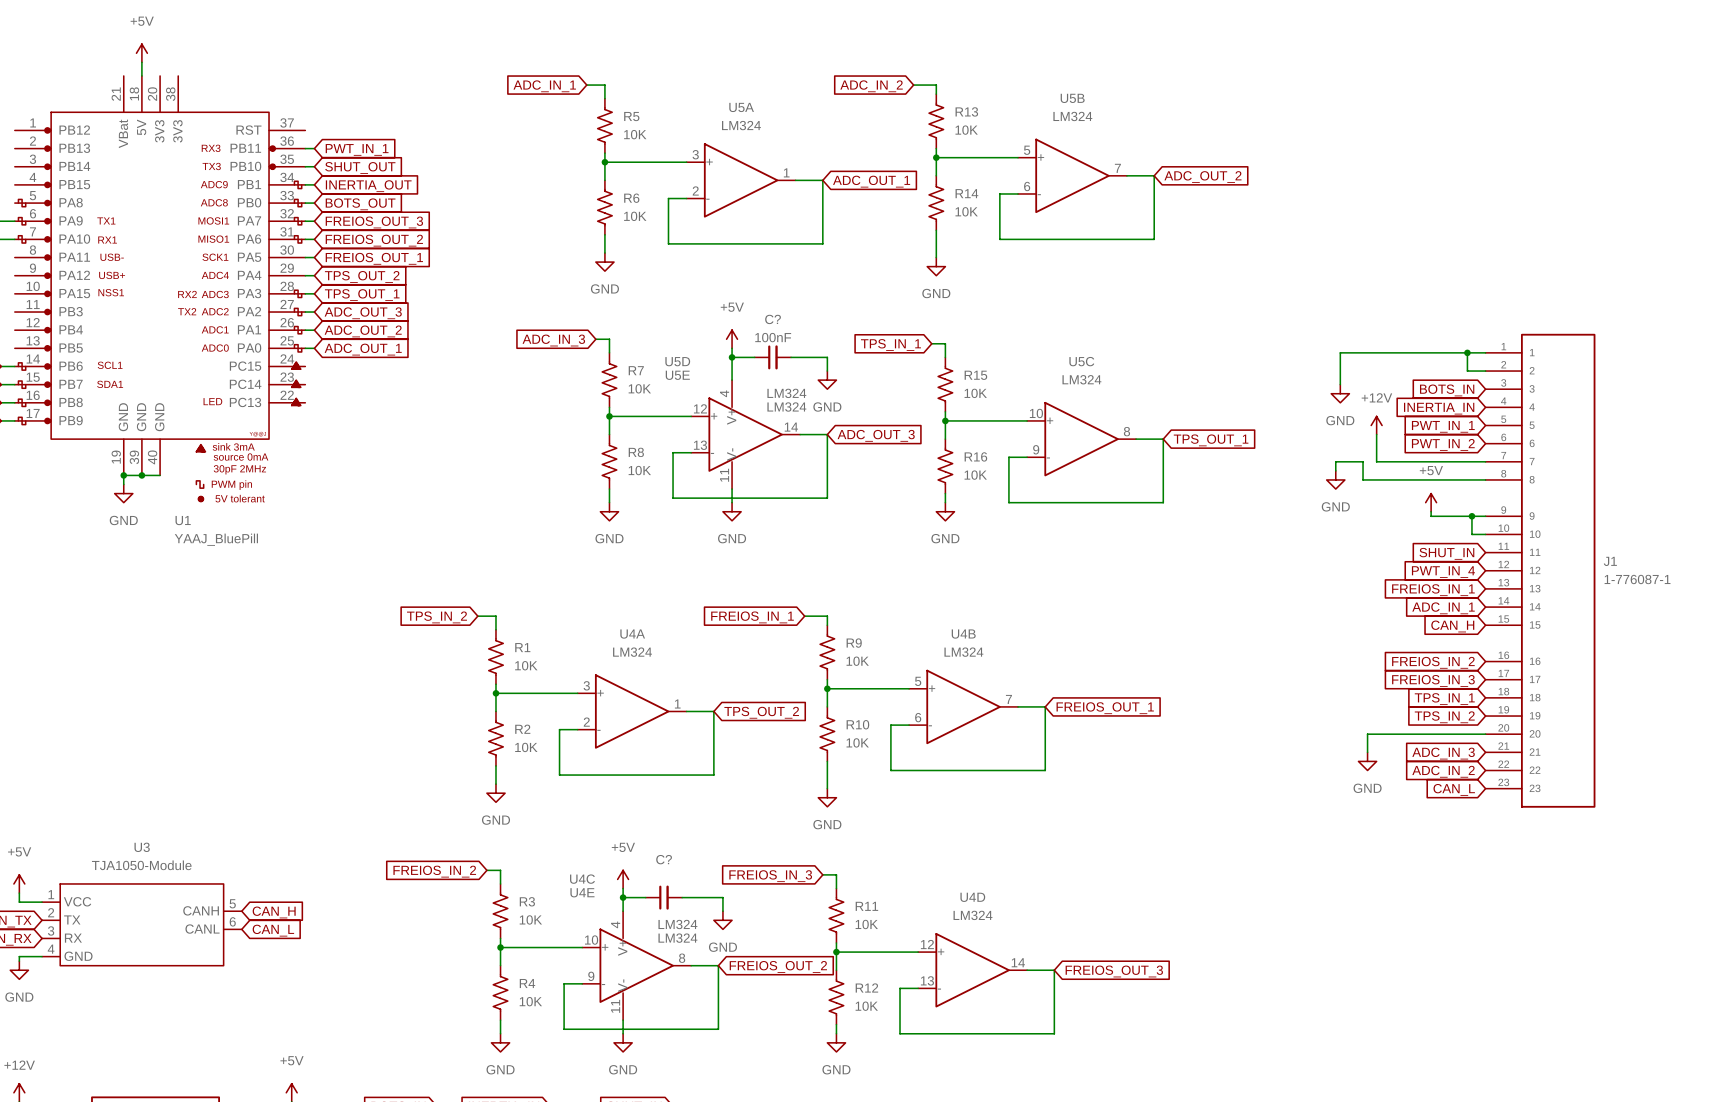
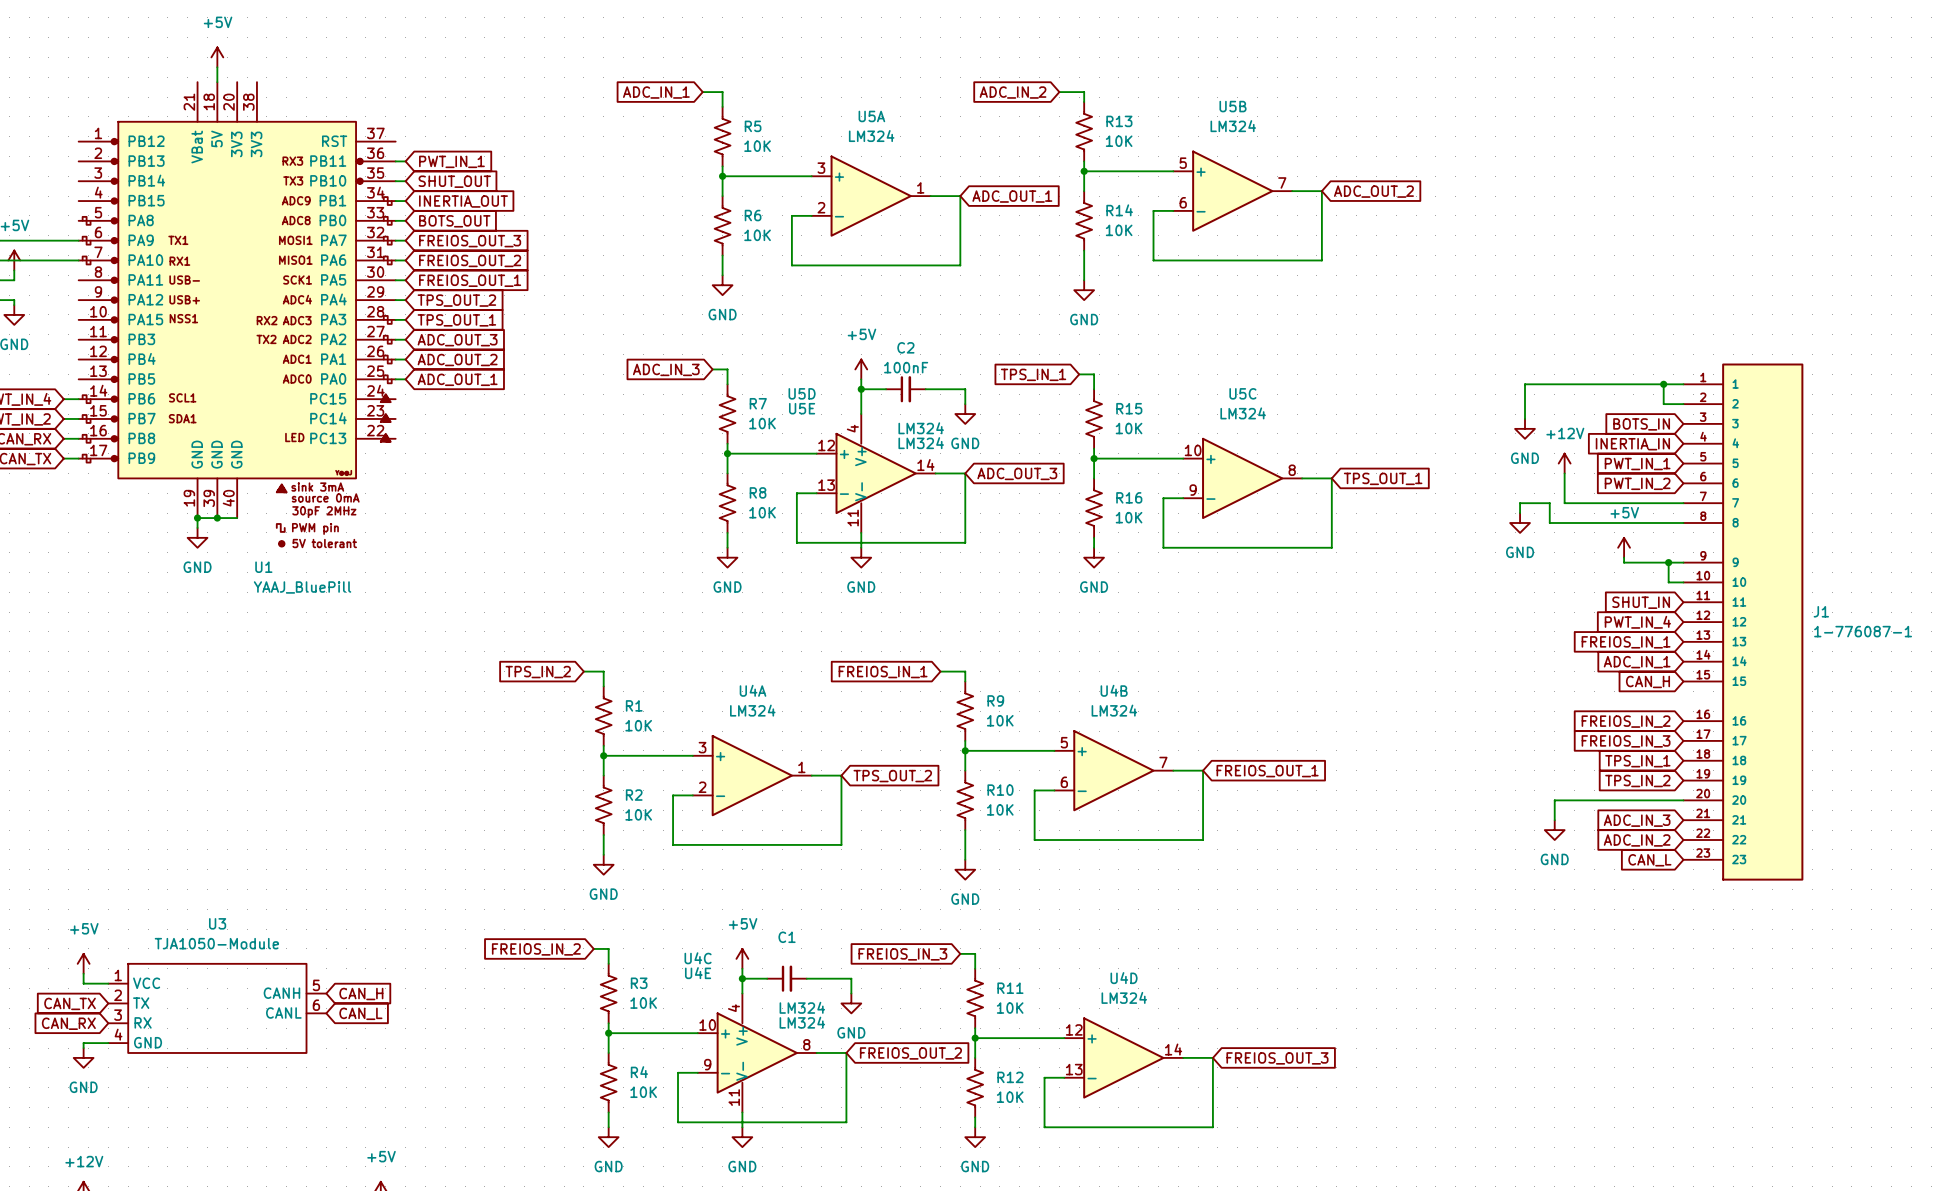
C? name: C? (773, 319) -> C2 (905, 347)
C? name: C? (664, 859) -> C1 (787, 937)

